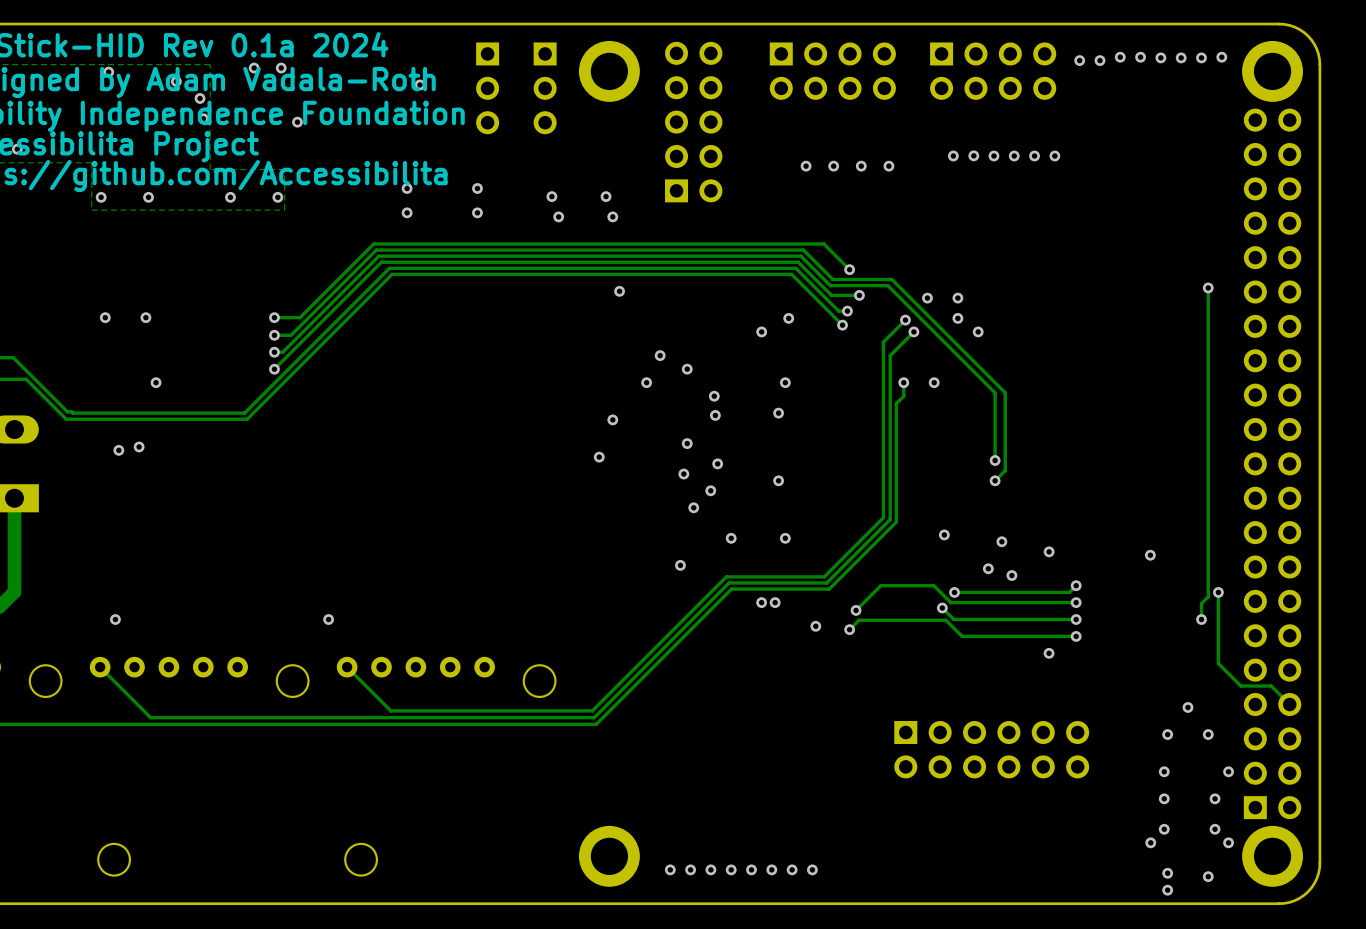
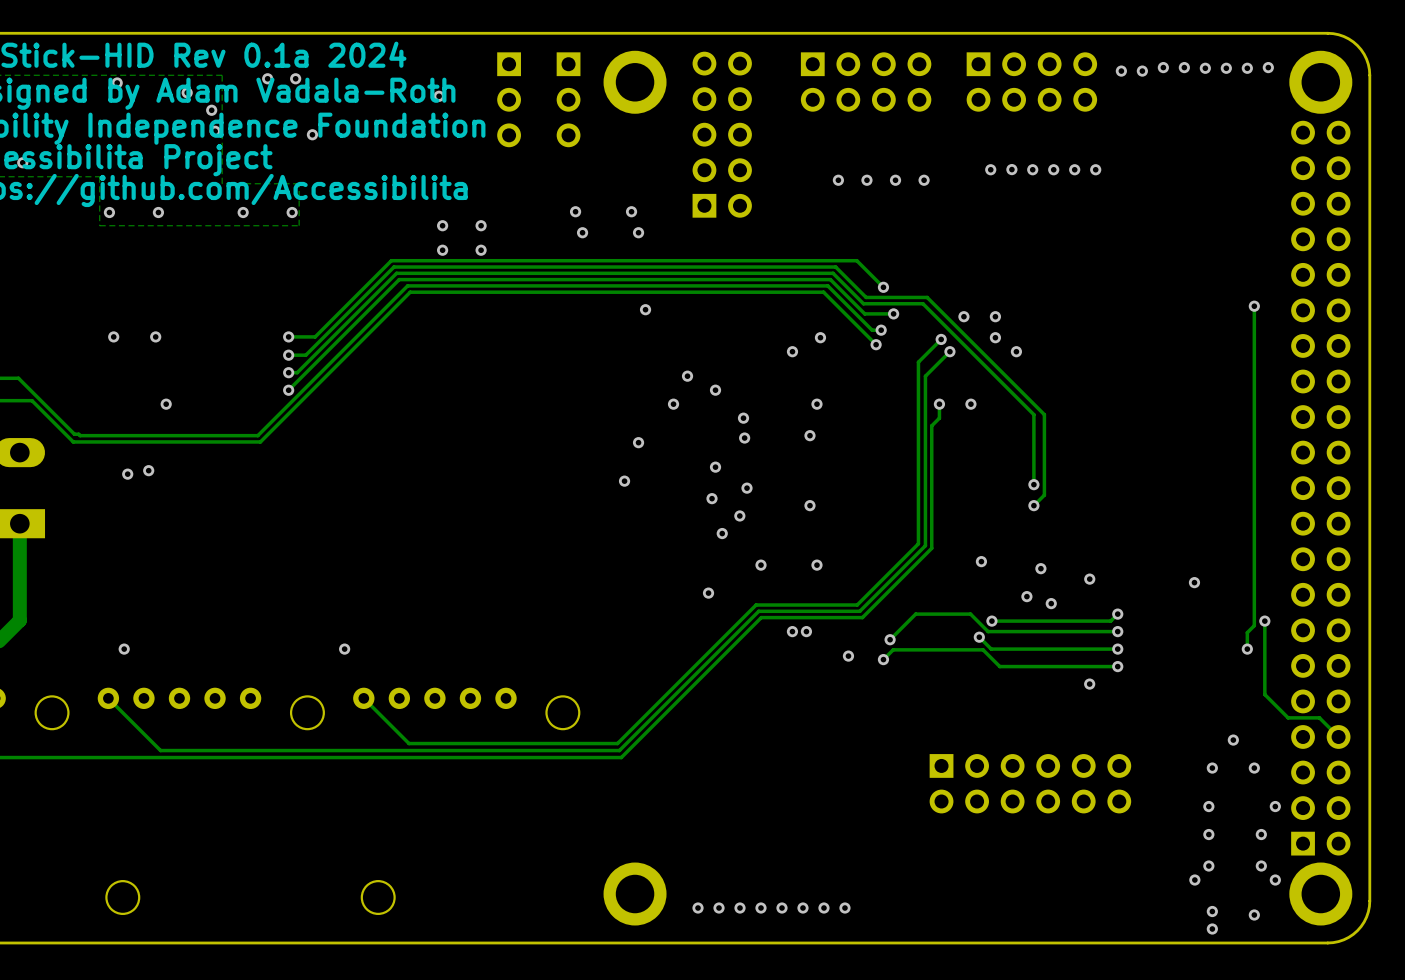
via: (407, 188) -> none
via: (477, 188) -> none
via: none -> (442, 225)
via: none -> (481, 225)
via: (407, 212) -> none
via: (477, 212) -> none
via: none -> (442, 250)
via: none -> (481, 250)

